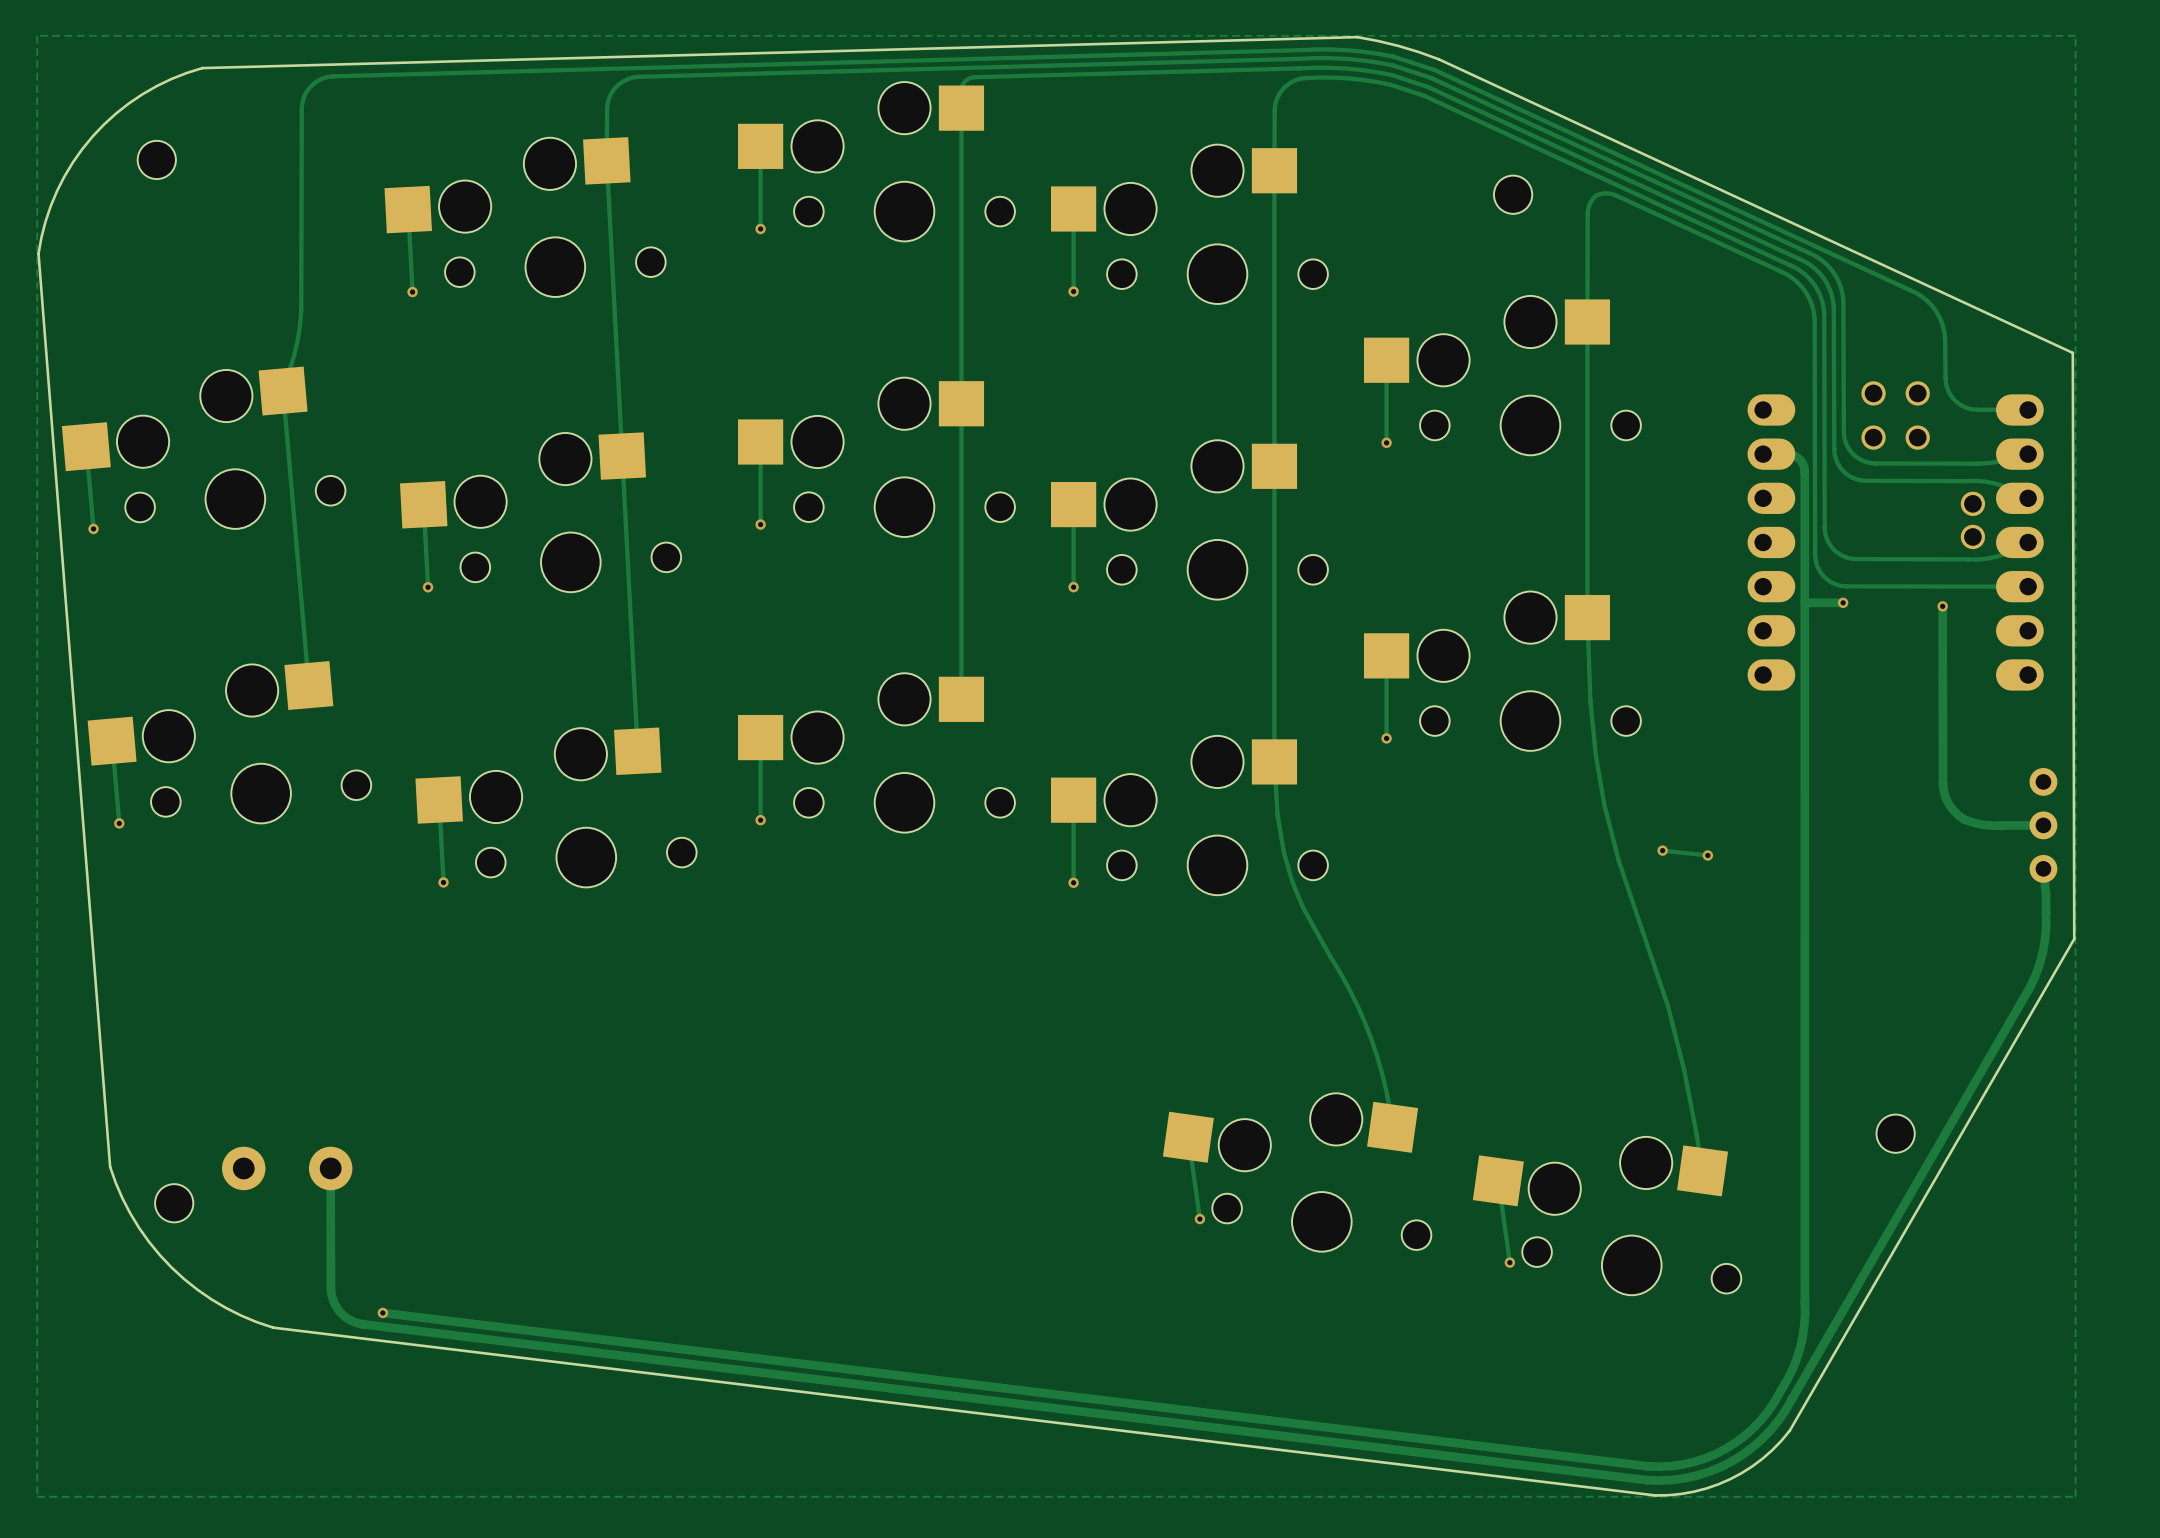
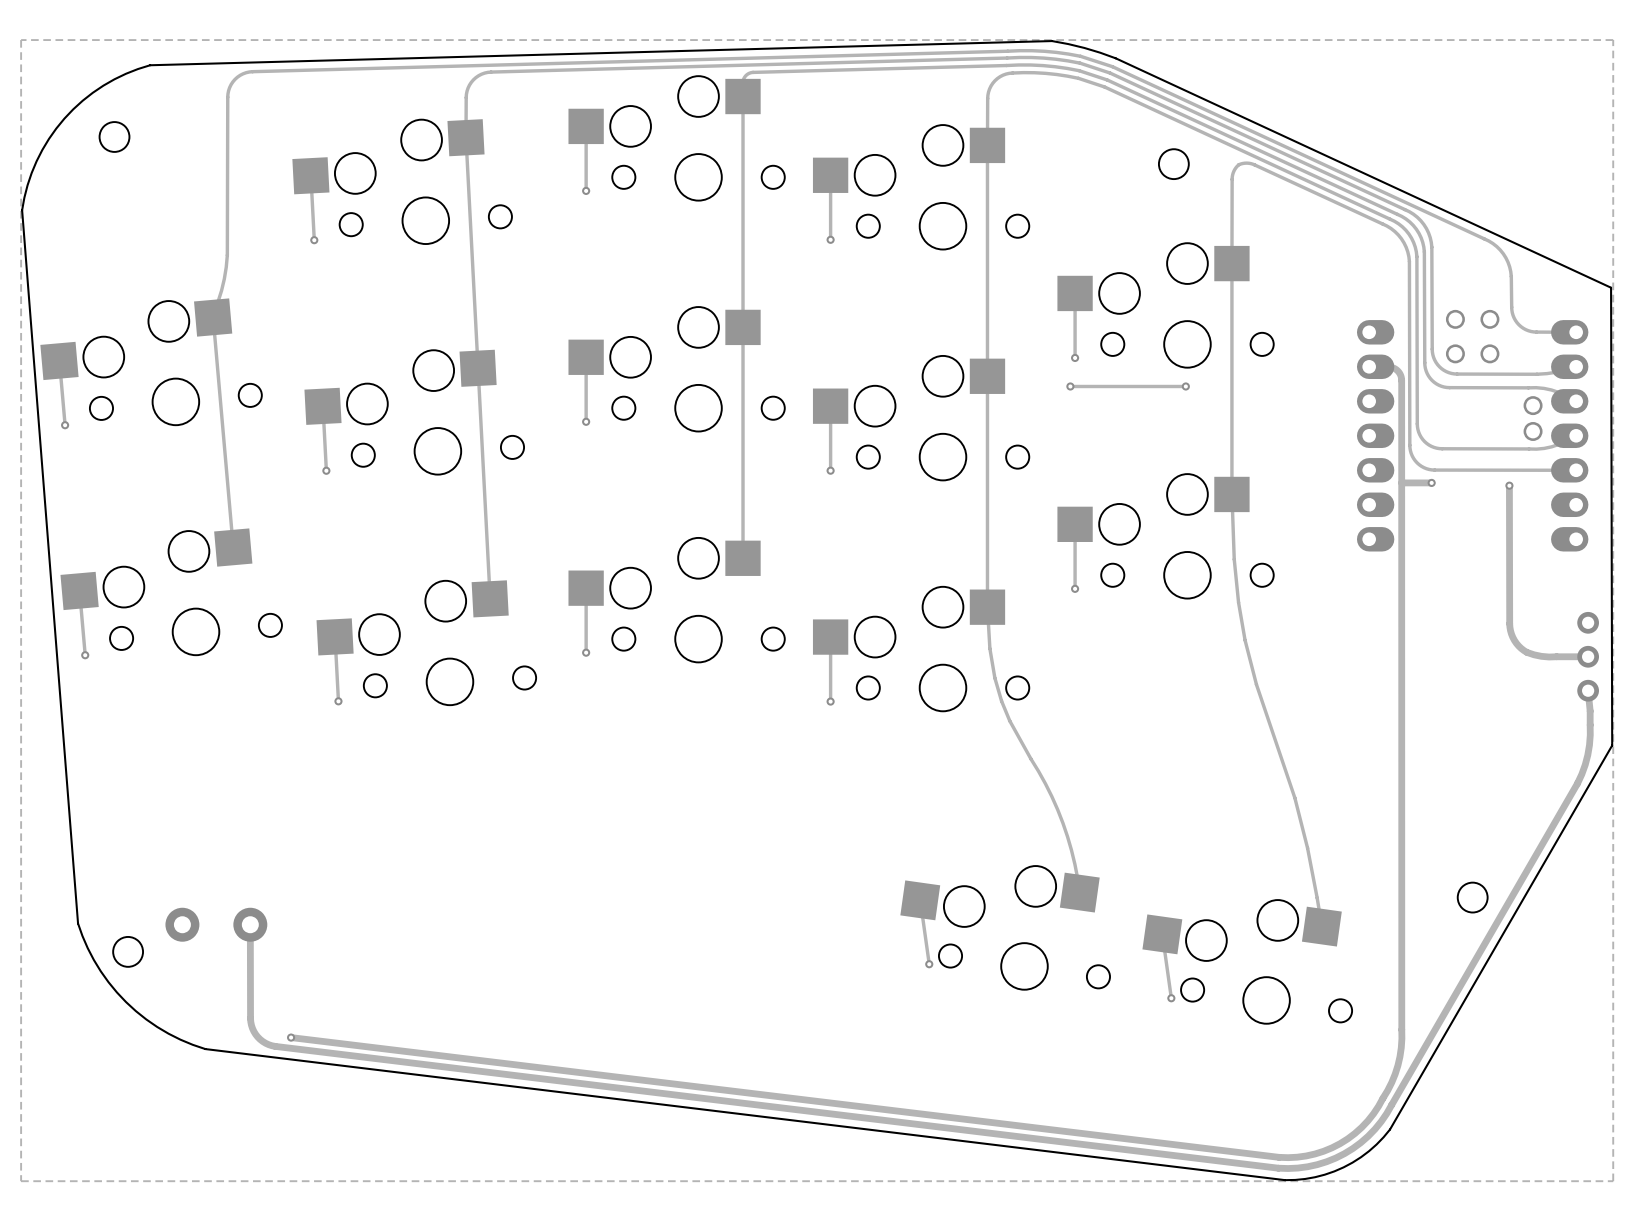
via: none -> (1070, 386)
track: none -> (1185, 386) (1070, 386)
via: none -> (1185, 386)
track: (1662, 850) (1707, 855) -> none
via: (1662, 850) -> none
via: (1707, 855) -> none

